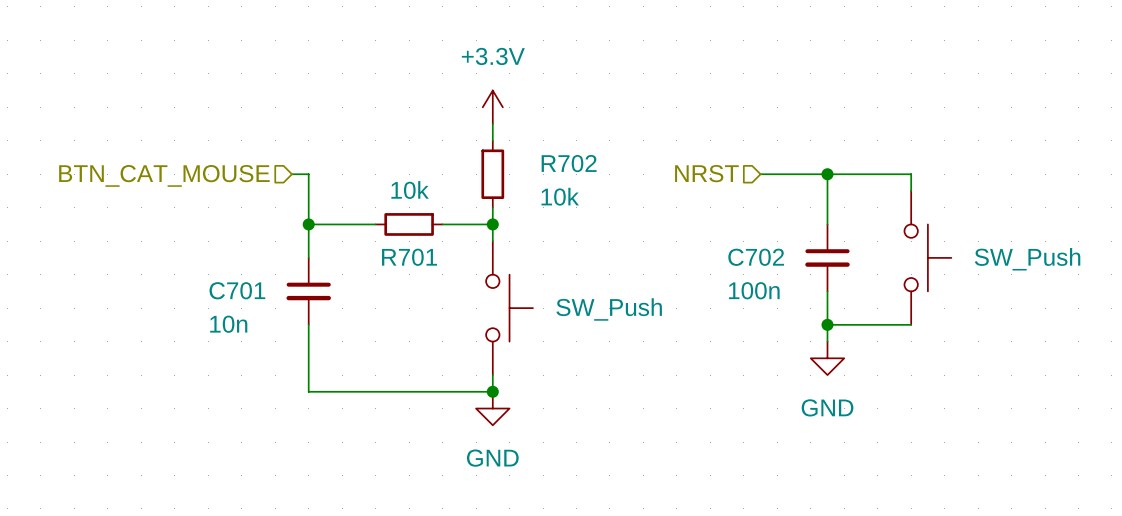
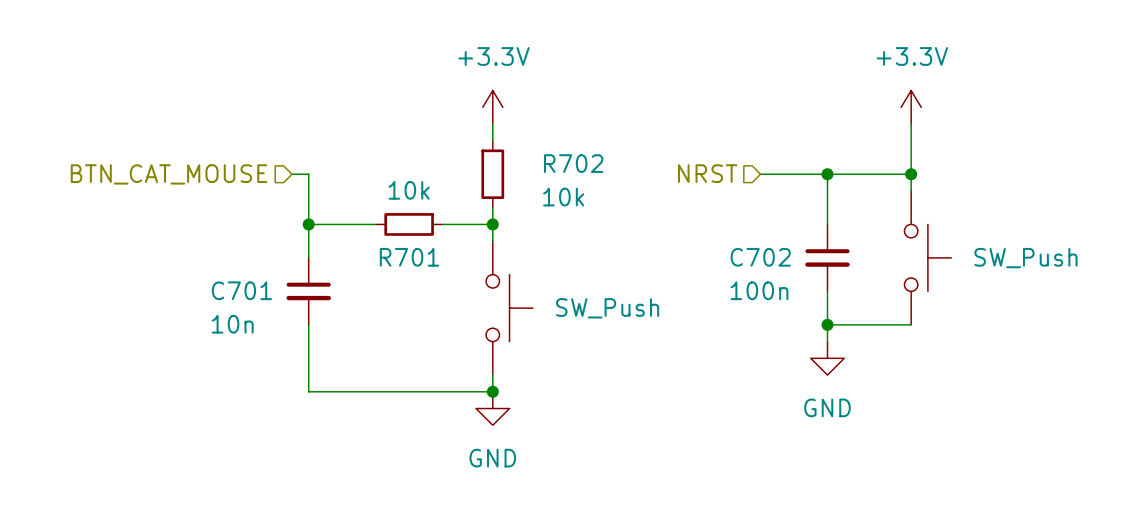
power symbol: none -> +3.3V (911, 107)
wire: none -> (911, 124) (911, 174)
junction: none -> (911, 174)

